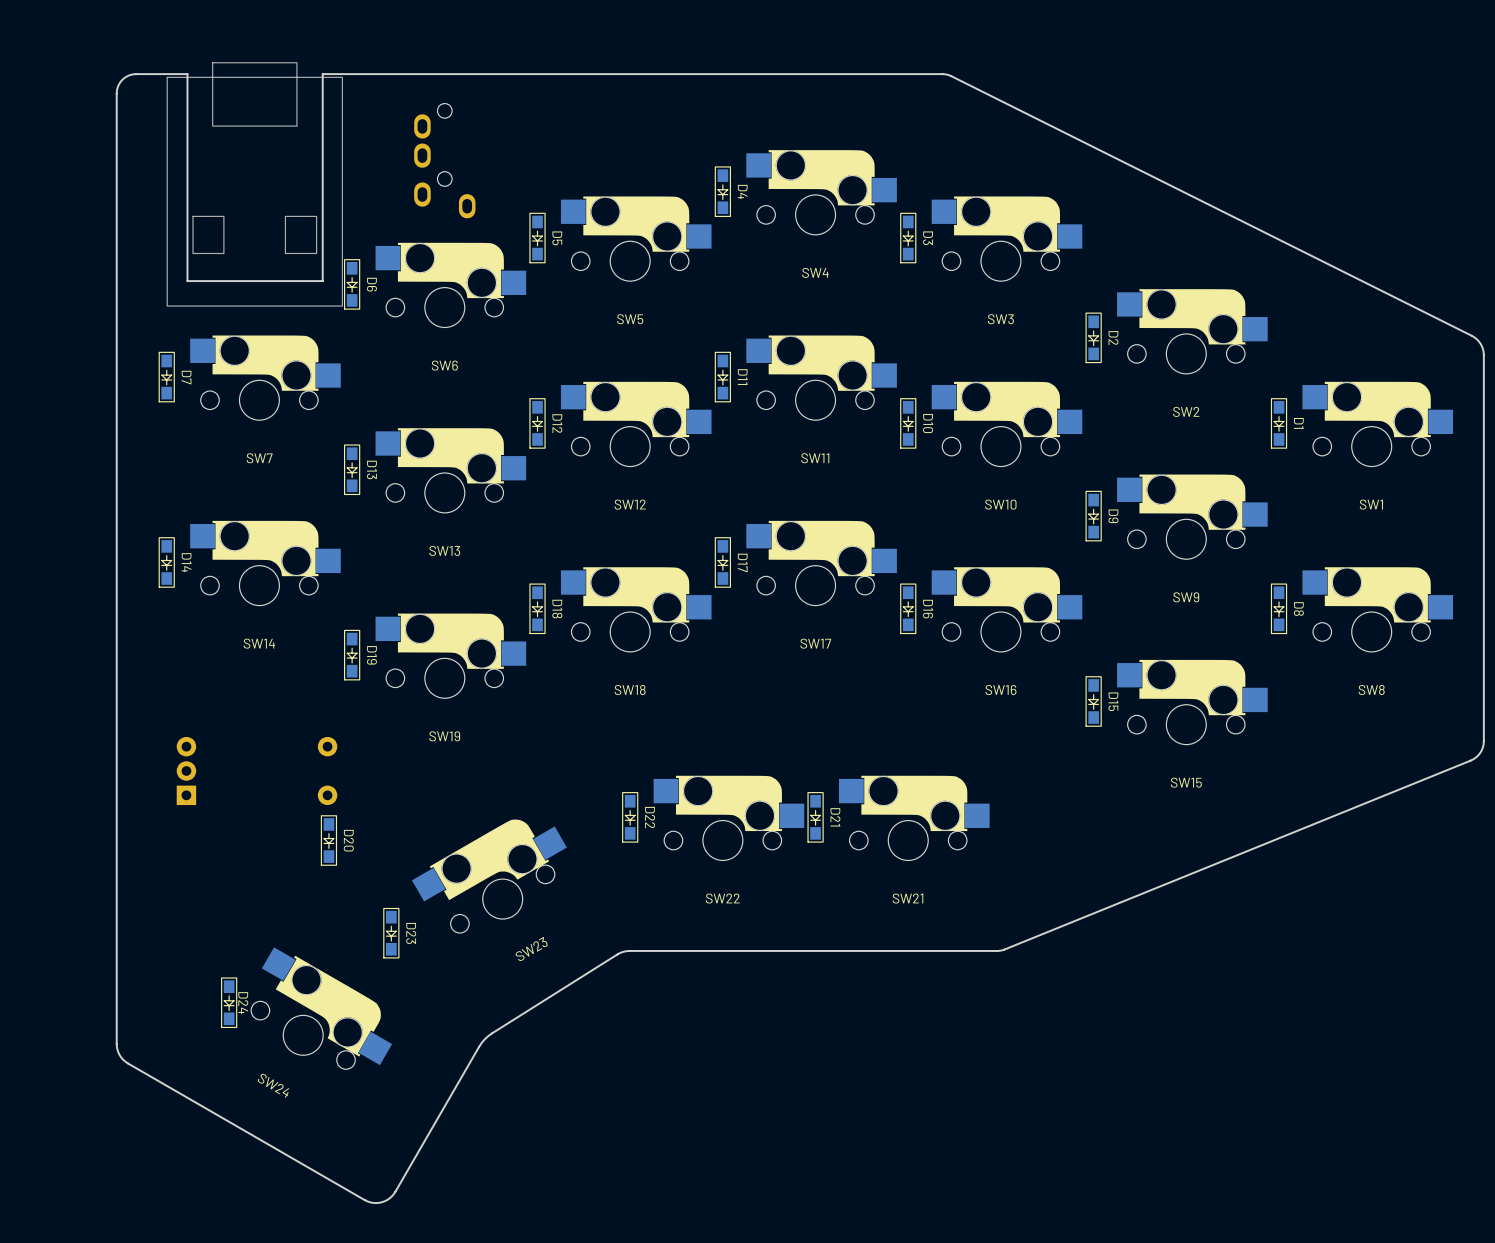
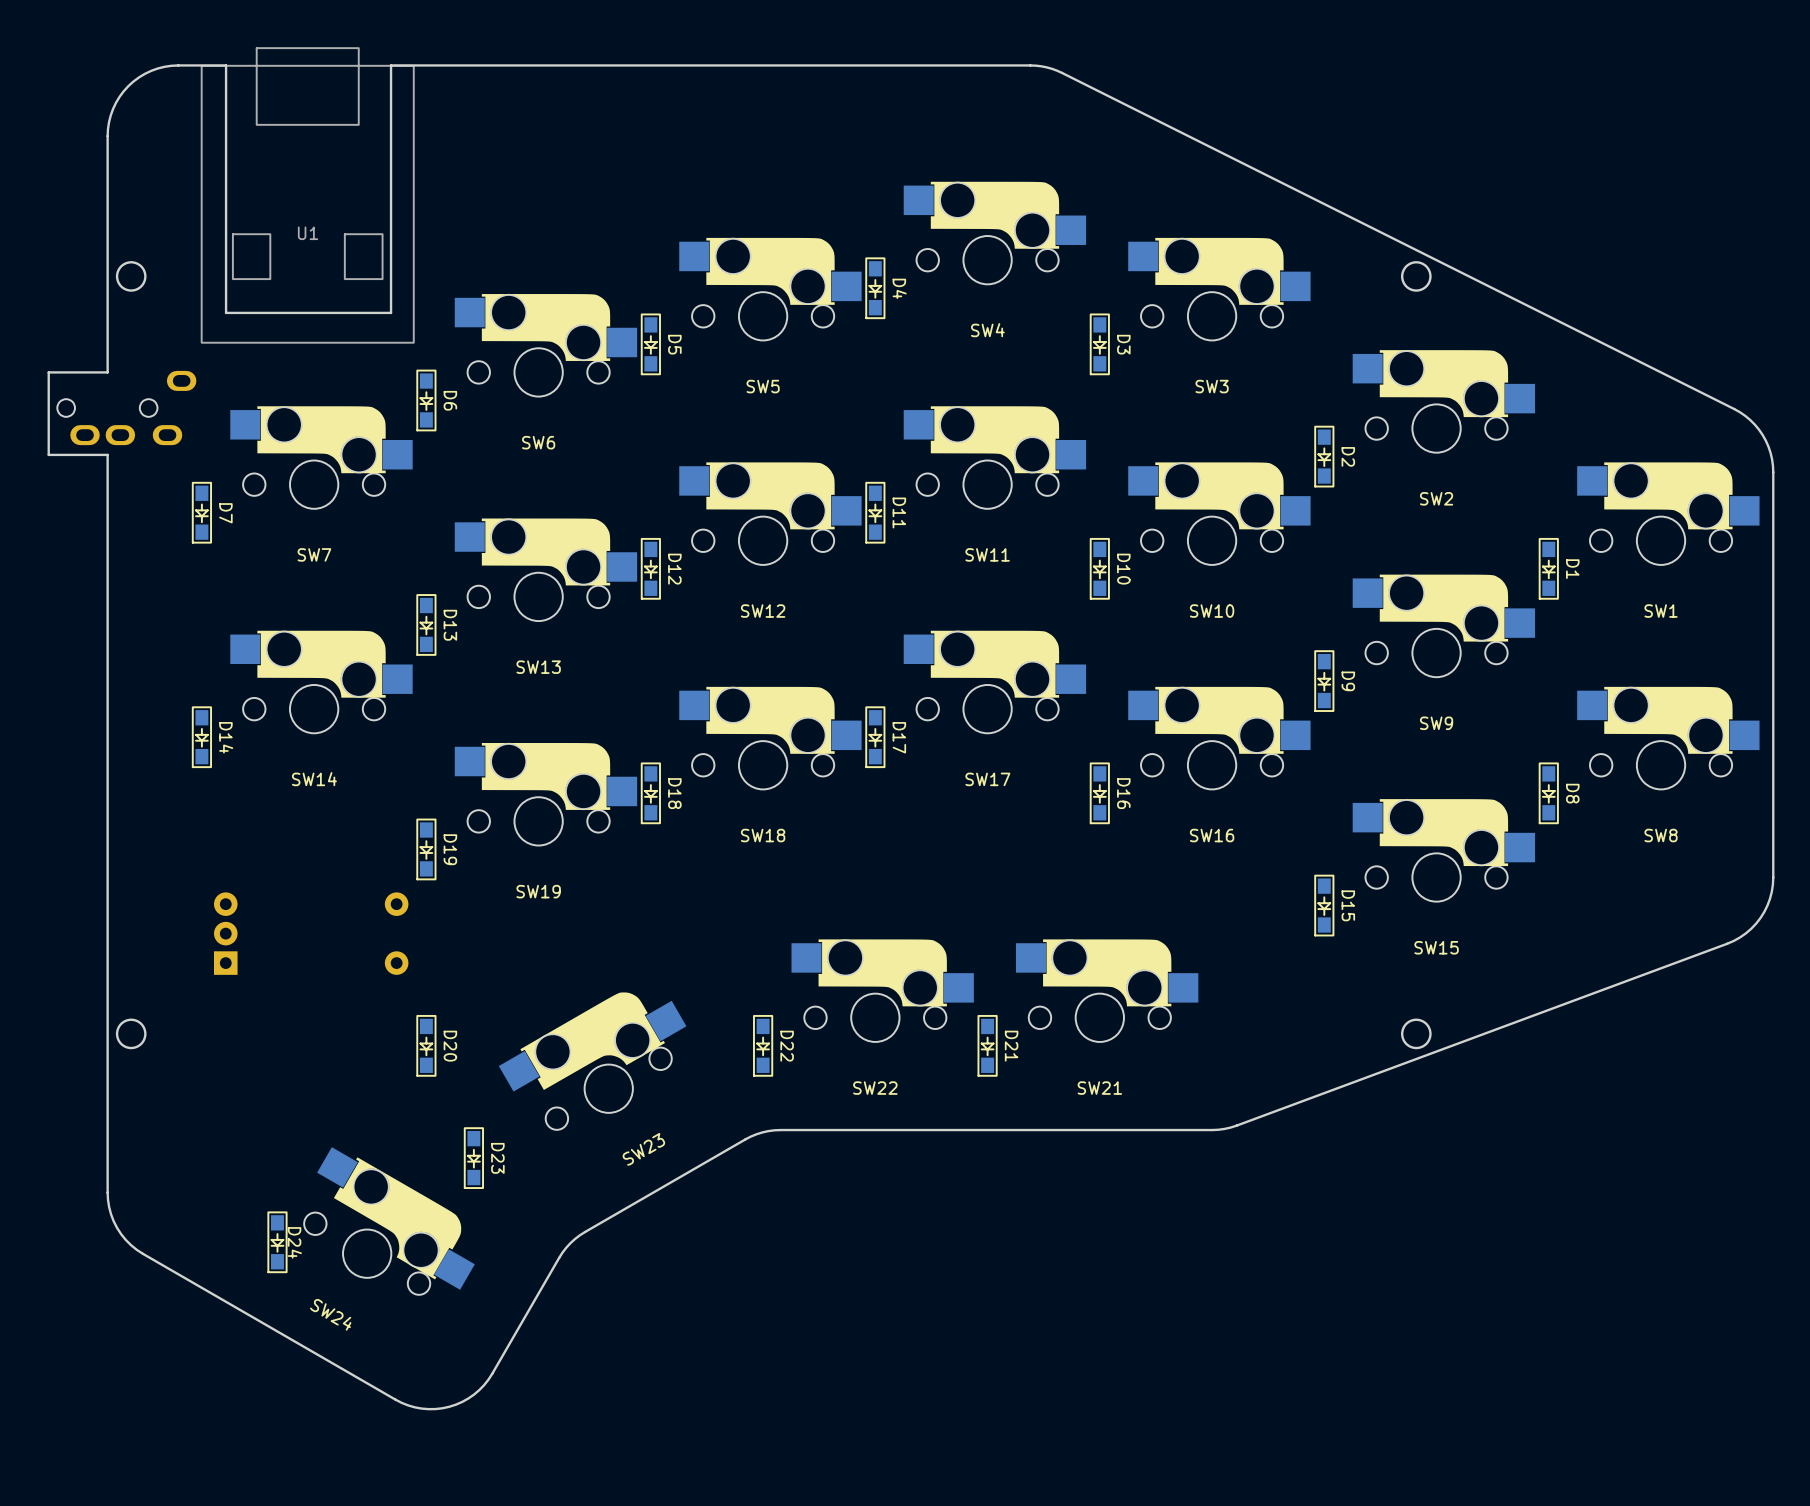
part: (444, 160) -> none
U1: none -> (307, 195)
part: (254, 184) -> none
D4 position: (722, 191) -> (875, 288)
round board edge: none -> [115, 261, 147, 292]
round board edge: none -> [1401, 261, 1432, 292]
D5 position: (537, 238) -> (650, 344)
D3 position: (908, 238) -> (1099, 344)
D6 position: (352, 284) -> (426, 400)
part: none -> (126, 408)
D2 position: (1093, 337) -> (1324, 456)
D7 position: (166, 377) -> (201, 512)
D11 position: (722, 377) -> (875, 512)
D12 position: (537, 423) -> (650, 568)
D10 position: (908, 423) -> (1099, 568)
D1 position: (1279, 423) -> (1548, 568)
D13 position: (352, 469) -> (426, 624)
D9 position: (1093, 516) -> (1324, 681)
D14 position: (166, 562) -> (201, 737)
D17 position: (722, 562) -> (875, 737)
D18 position: (537, 608) -> (650, 793)
D16 position: (908, 608) -> (1099, 793)
D8 position: (1279, 608) -> (1548, 793)
D19 position: (352, 655) -> (426, 849)
D15 position: (1093, 701) -> (1324, 905)
D22 position: (630, 817) -> (763, 1045)
D21 position: (815, 817) -> (987, 1045)
D20 position: (328, 840) -> (426, 1045)
round board edge: none -> [115, 1018, 147, 1050]
round board edge: none -> [1401, 1018, 1432, 1050]
D23 position: (391, 933) -> (473, 1158)
D24 position: (229, 1002) -> (277, 1242)
board edge: (479, 1046) (492, 1033) (617, 954) (625, 951) (1002, 950) (1475, 758) (1481, 750) (1483, 741) (1483, 355) (1479, 341) (1471, 335) (951, 76) (942, 74) (322, 74) (322, 281) (187, 281) (187, 74) (136, 74) (125, 77) (118, 85) (116, 93) (117, 1050) (127, 1063) (364, 1200) (375, 1203) (387, 1200) (395, 1191) (479, 1046) -> (1030, 65) (1046, 67) (1062, 72) (1734, 409) (1754, 424) (1768, 446) (1773, 472) (1773, 877) (1770, 898) (1760, 917) (1745, 933) (1727, 943) (1224, 1128) (780, 1130) (756, 1134) (574, 1239) (559, 1257) (488, 1379) (468, 1398) (442, 1408) (414, 1407) (395, 1399) (136, 1249) (125, 1239) (117, 1227) (109, 1207) (107, 1192) (107, 454) (48, 454) (48, 372) (107, 372) (107, 129) (113, 109) (123, 91) (139, 77) (157, 68) (178, 65) (226, 65) (226, 312) (391, 312) (391, 65) (1030, 65)

